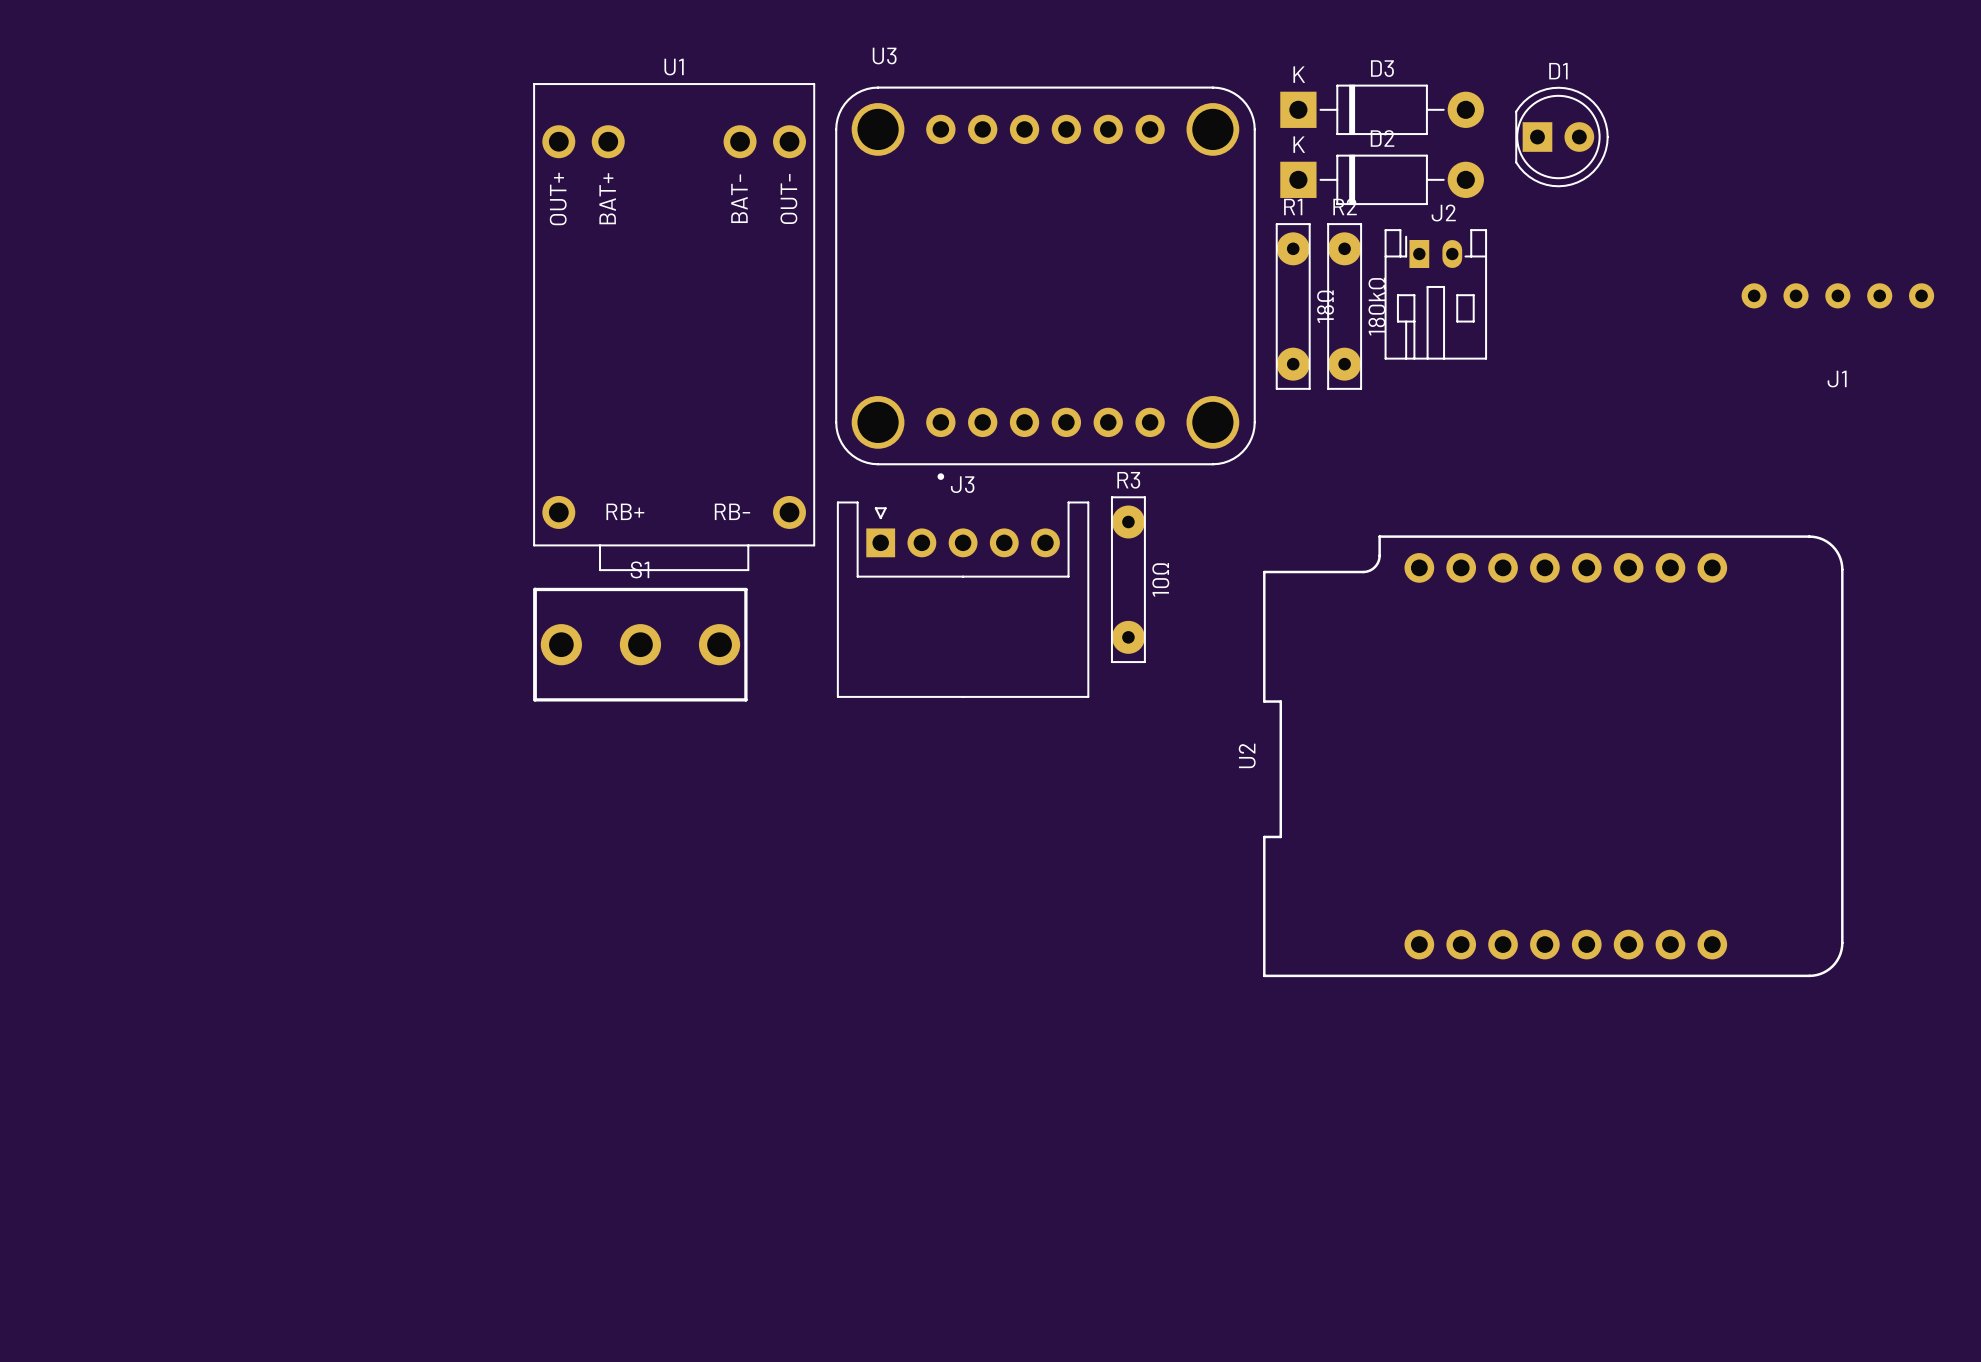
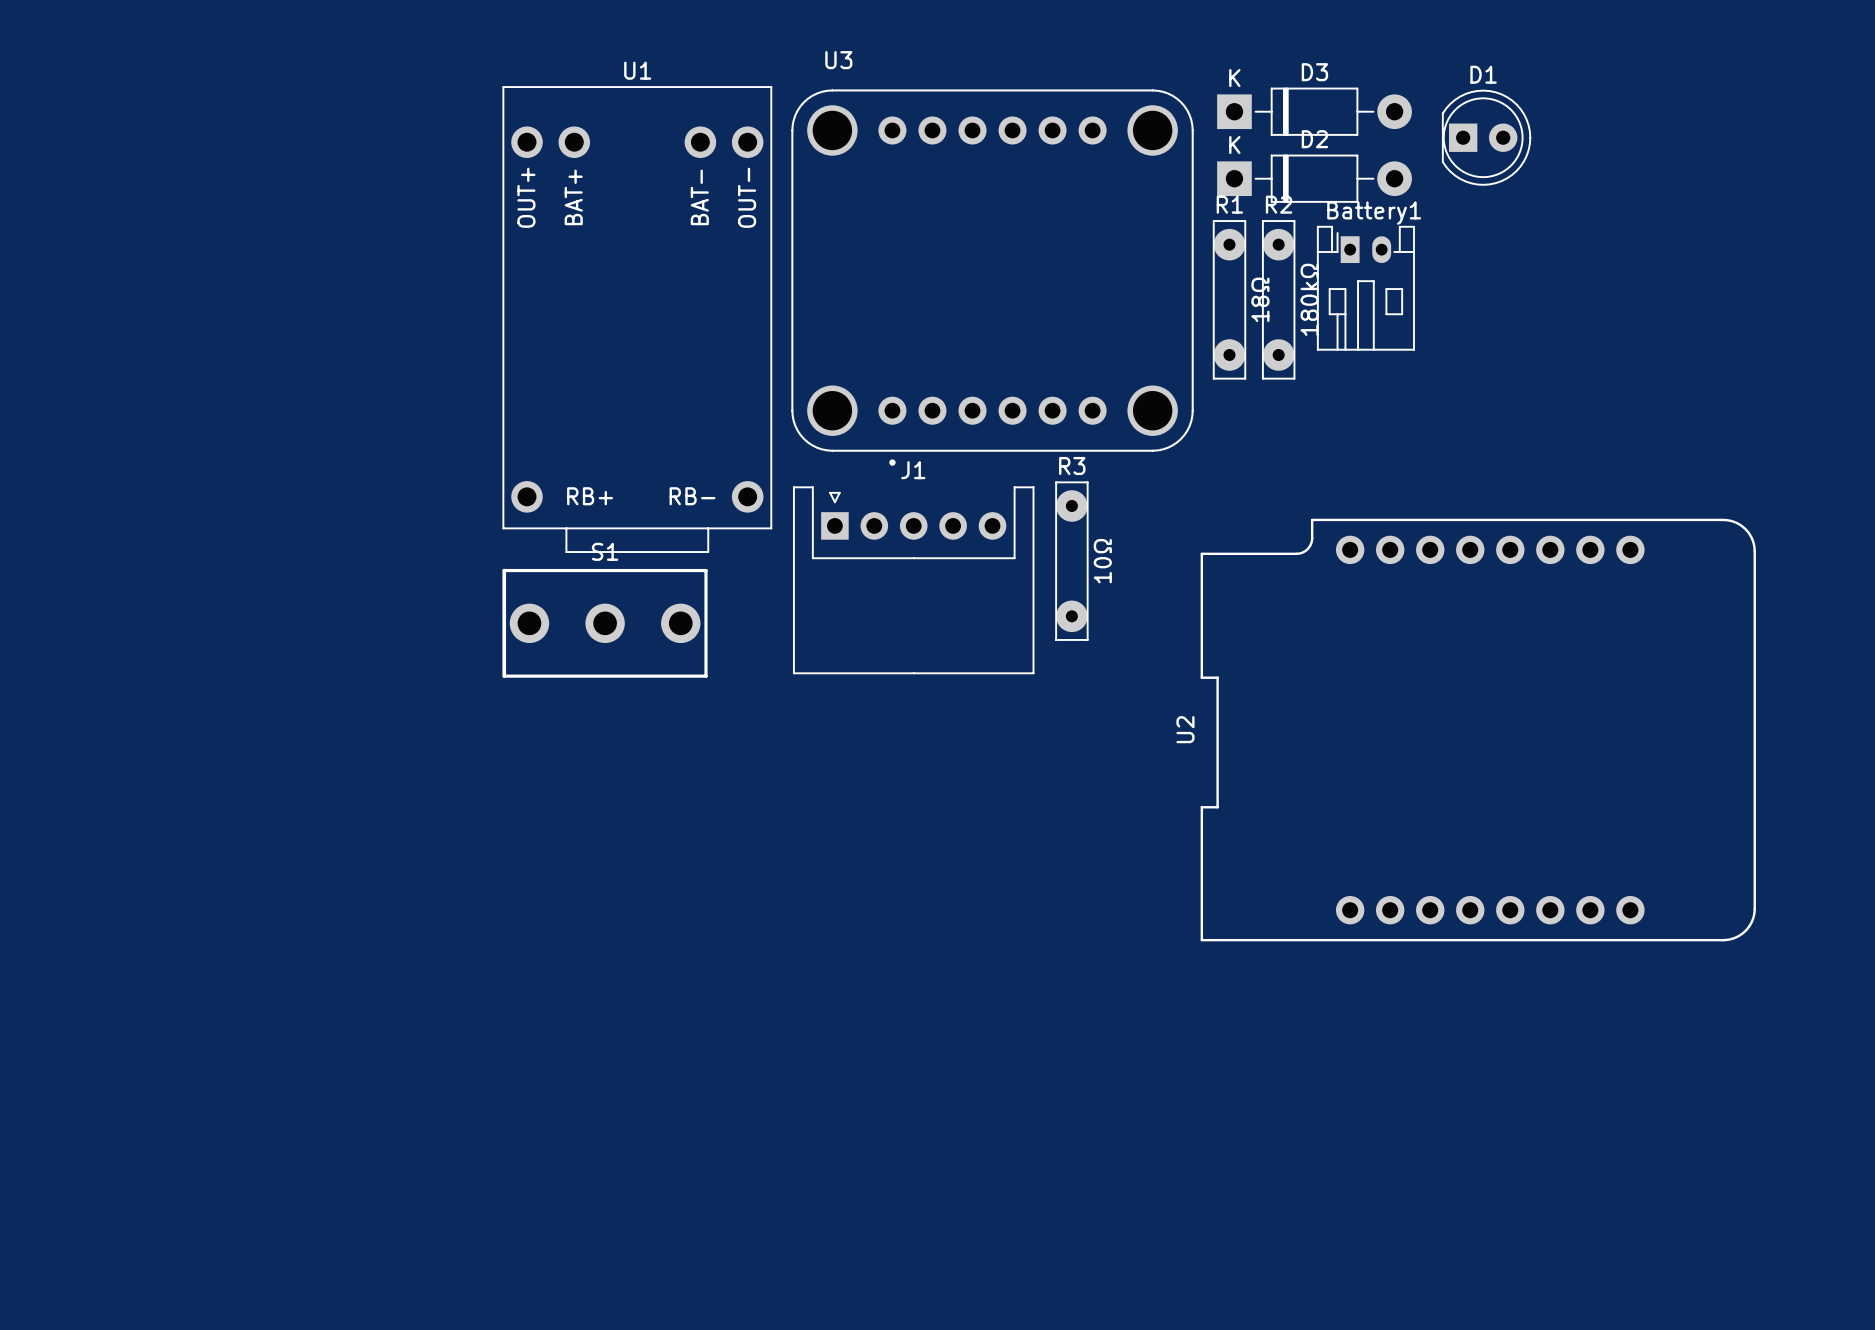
J2 name: J2 (1443, 213) -> Battery1 (1374, 213)
J1: (1837, 295) -> none
J3 name: J3 (962, 484) -> J1 (913, 470)

